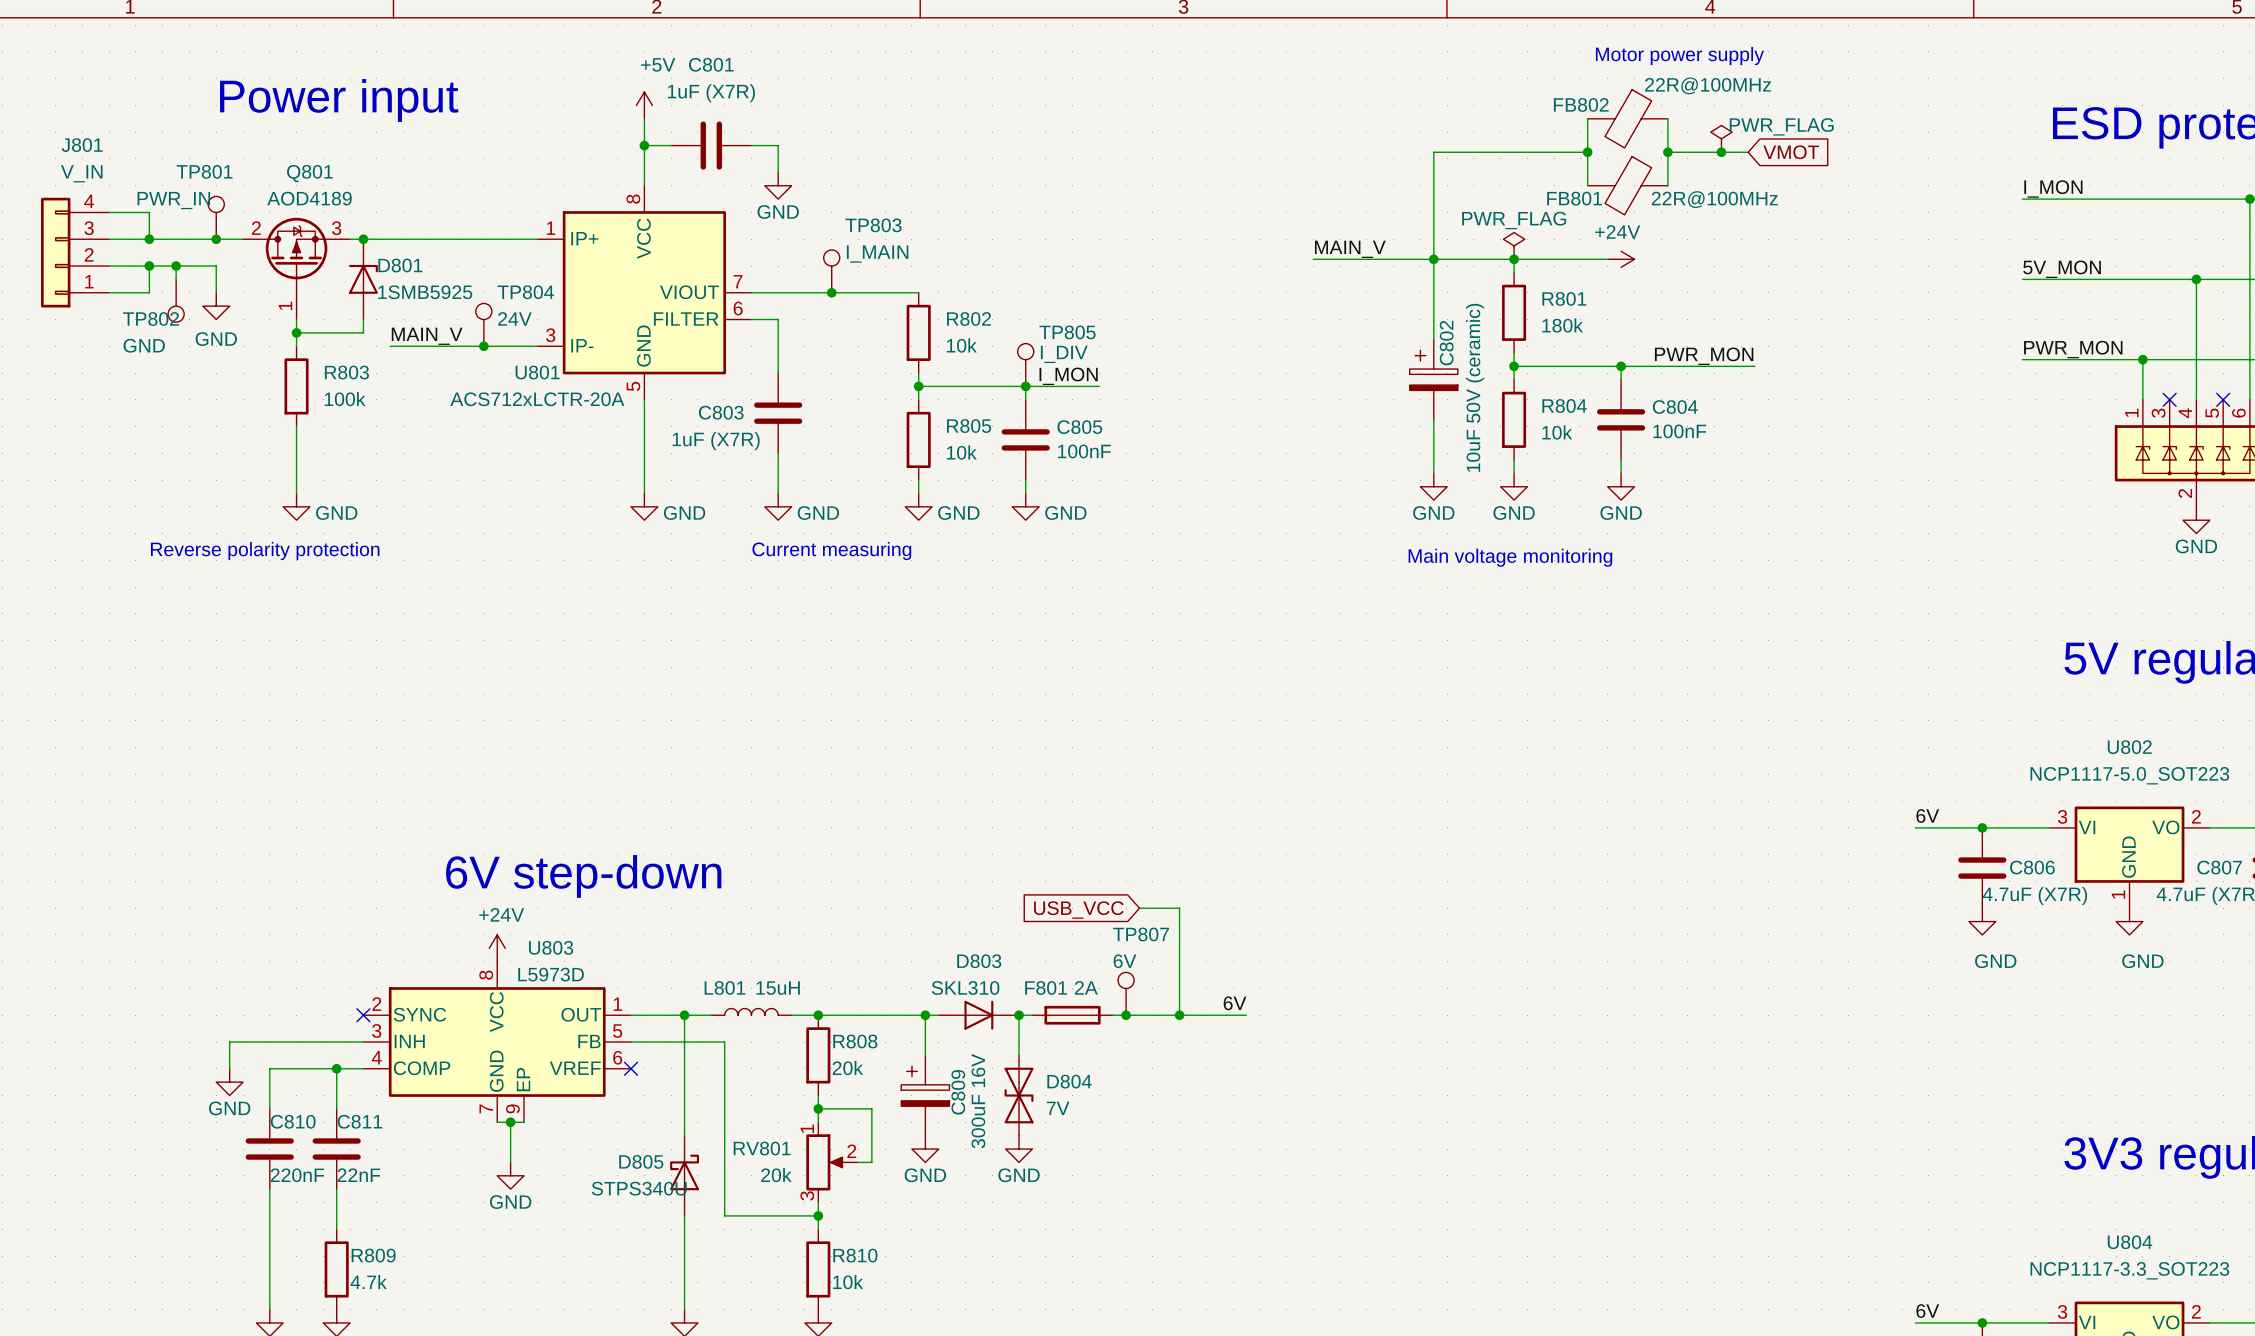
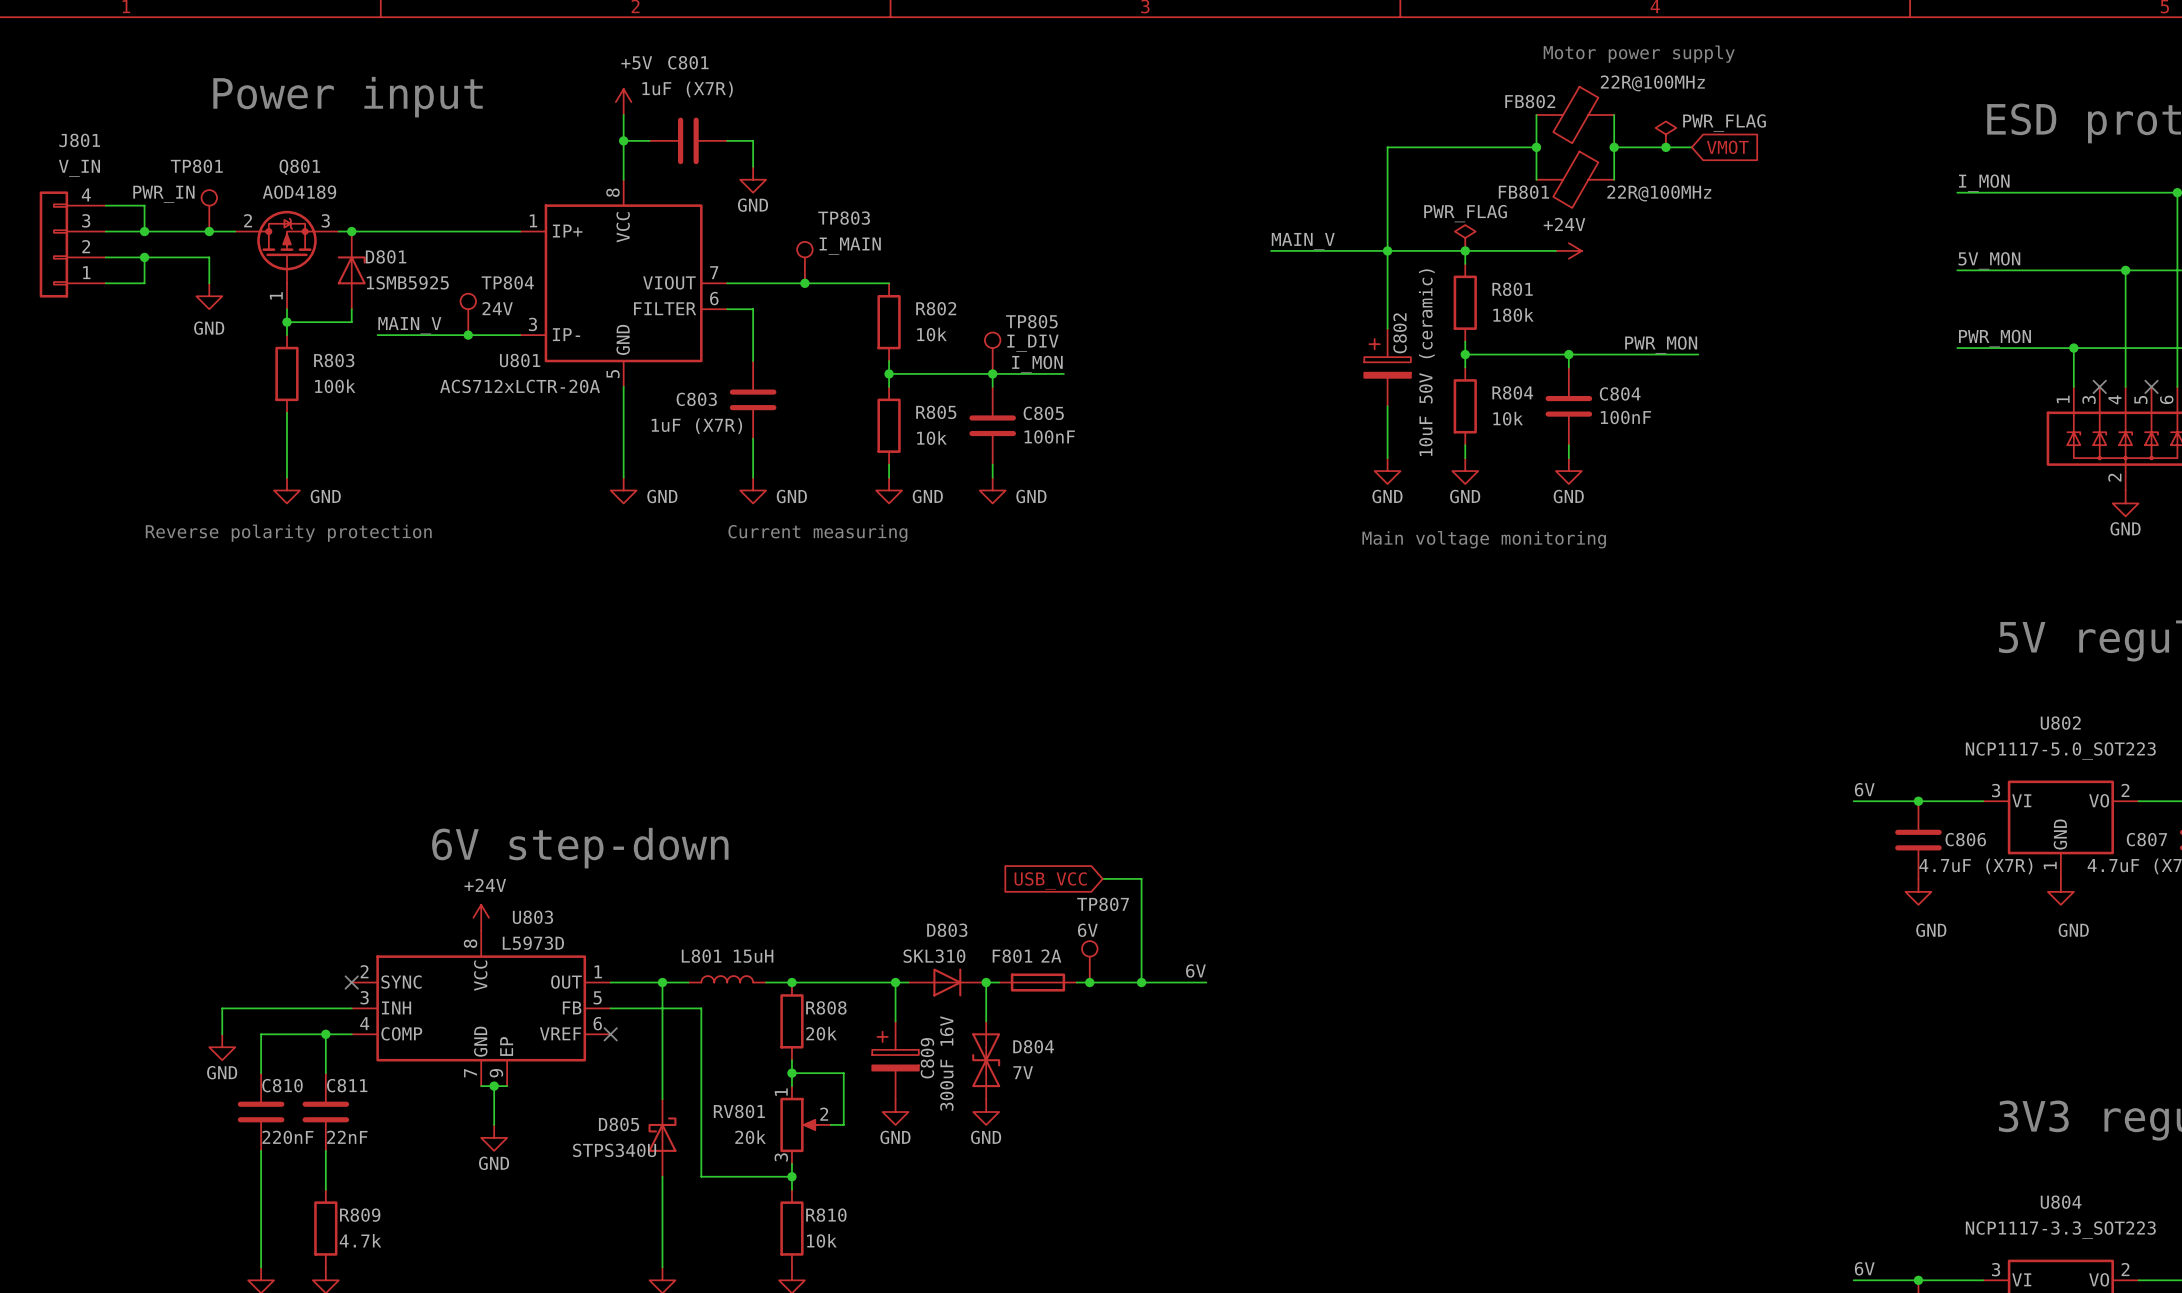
wire: (176, 266) (176, 279) -> none
junction: (176, 266) -> none
TP802: GND (176, 300) -> none

